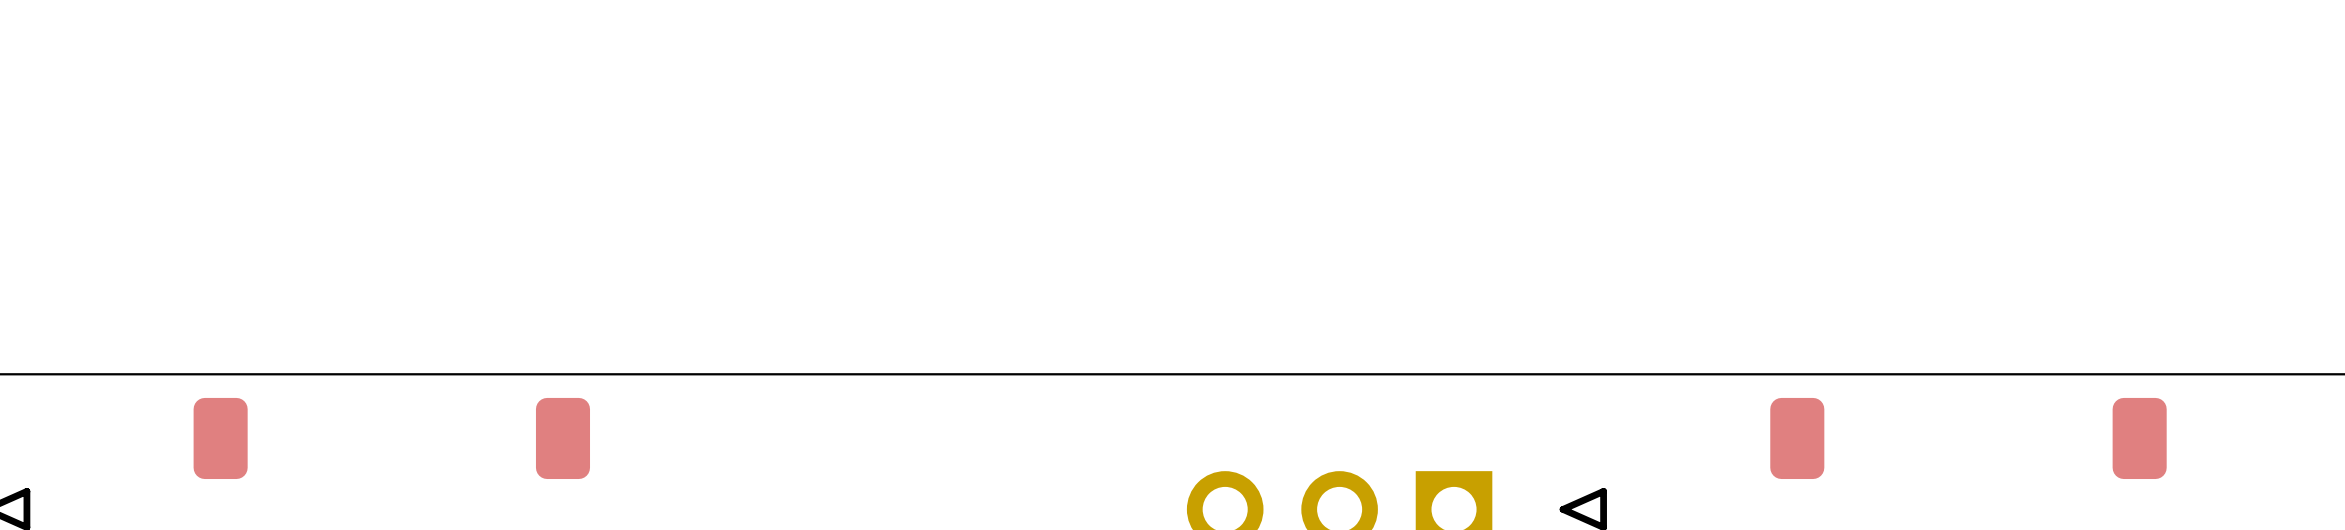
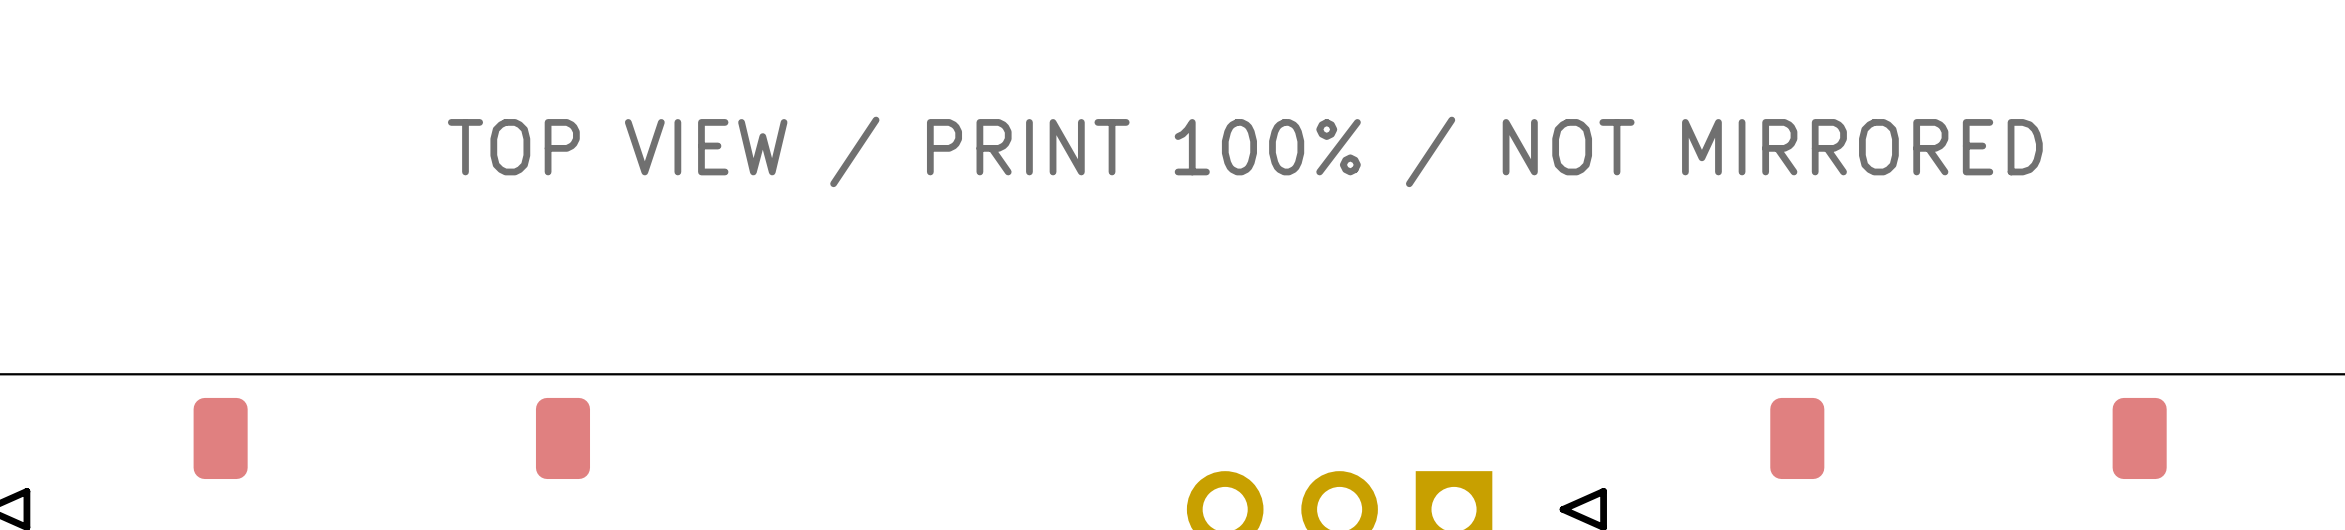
text: none -> TOP VIEW / PRINT 100% / NOT MIRRORED (1245, 151)

